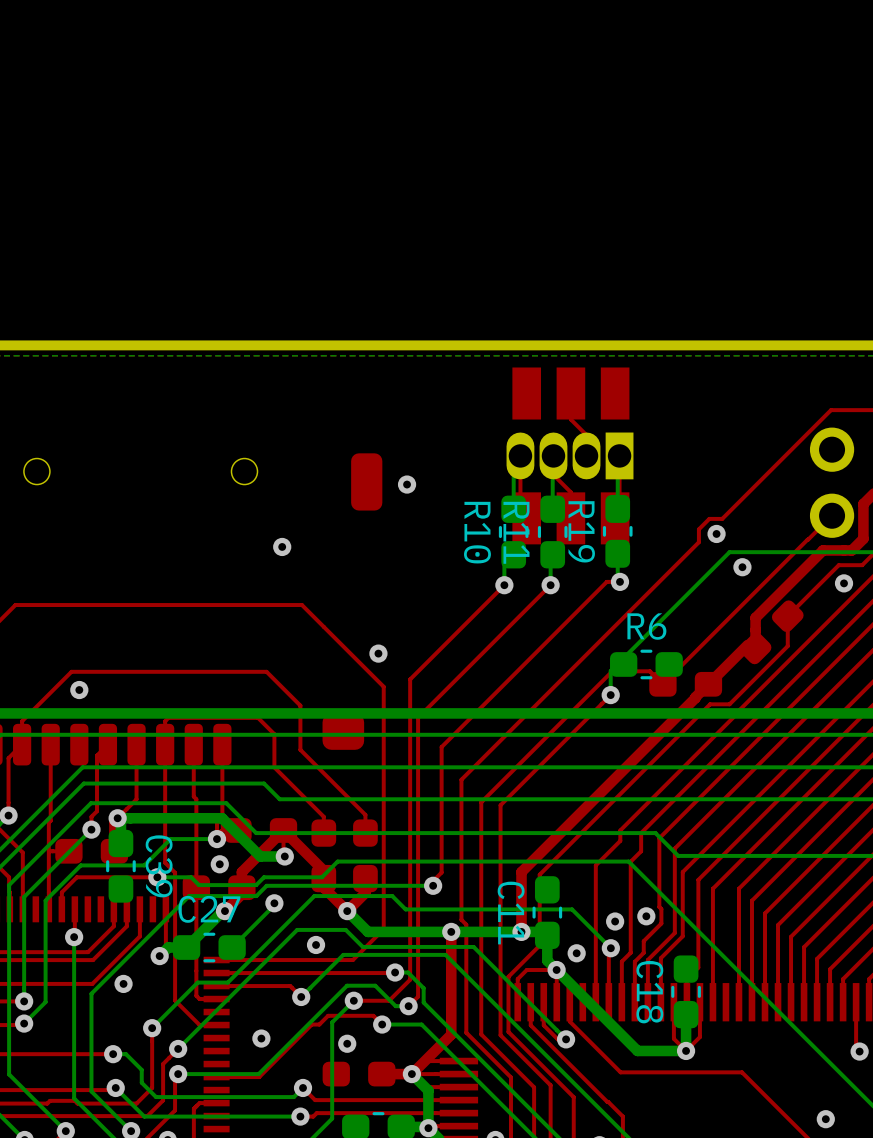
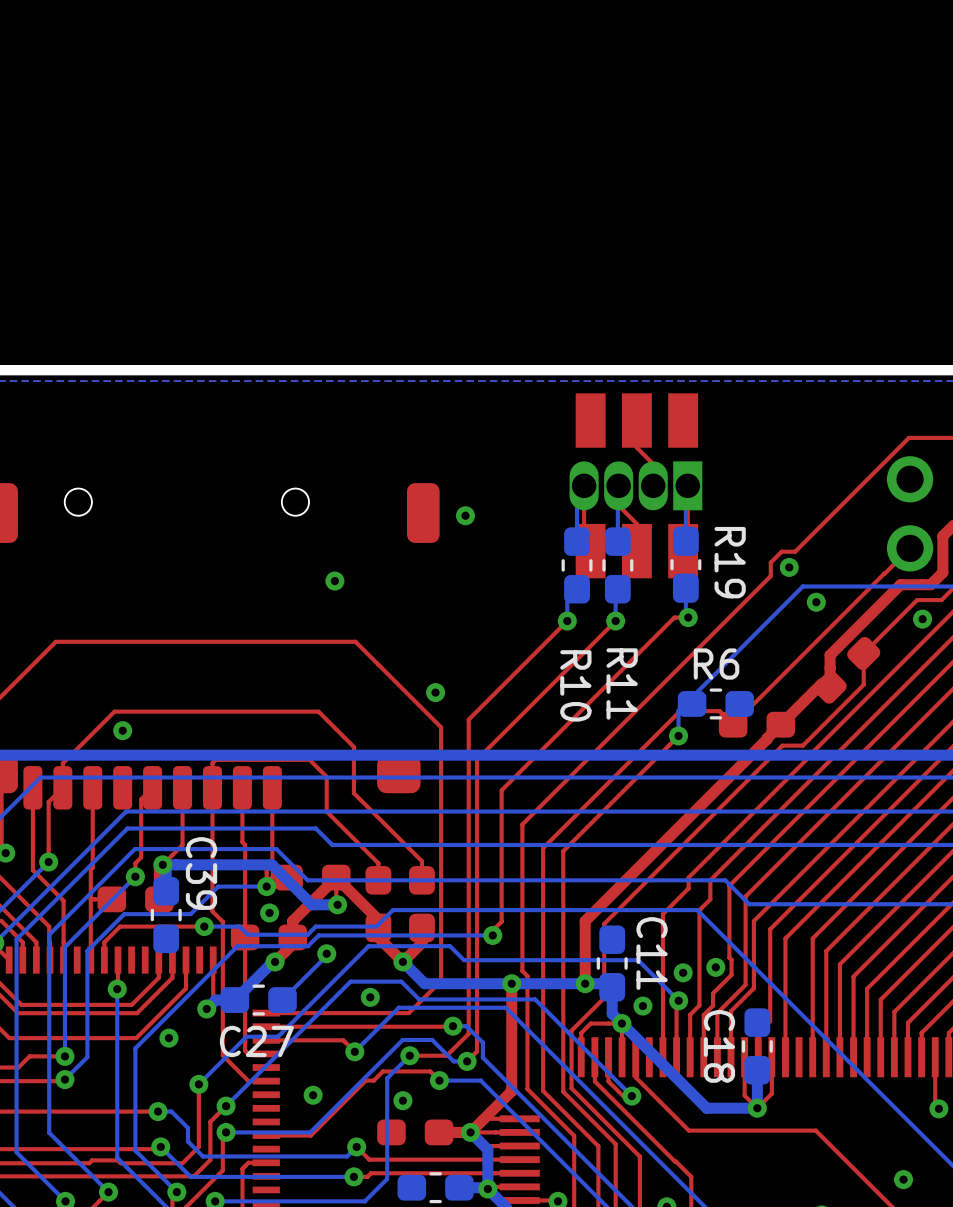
R19 name position: R19 (581, 531) -> R19 (730, 562)
R10 name position: R10 (477, 532) -> R10 (575, 685)
R11 name position: R11 (516, 532) -> R11 (622, 683)
C39 name position: C39 (159, 866) -> C39 (201, 873)
C27 name position: C27 (209, 909) -> C27 (256, 1041)
C11 name position: C11 (511, 913) -> C11 (652, 953)

